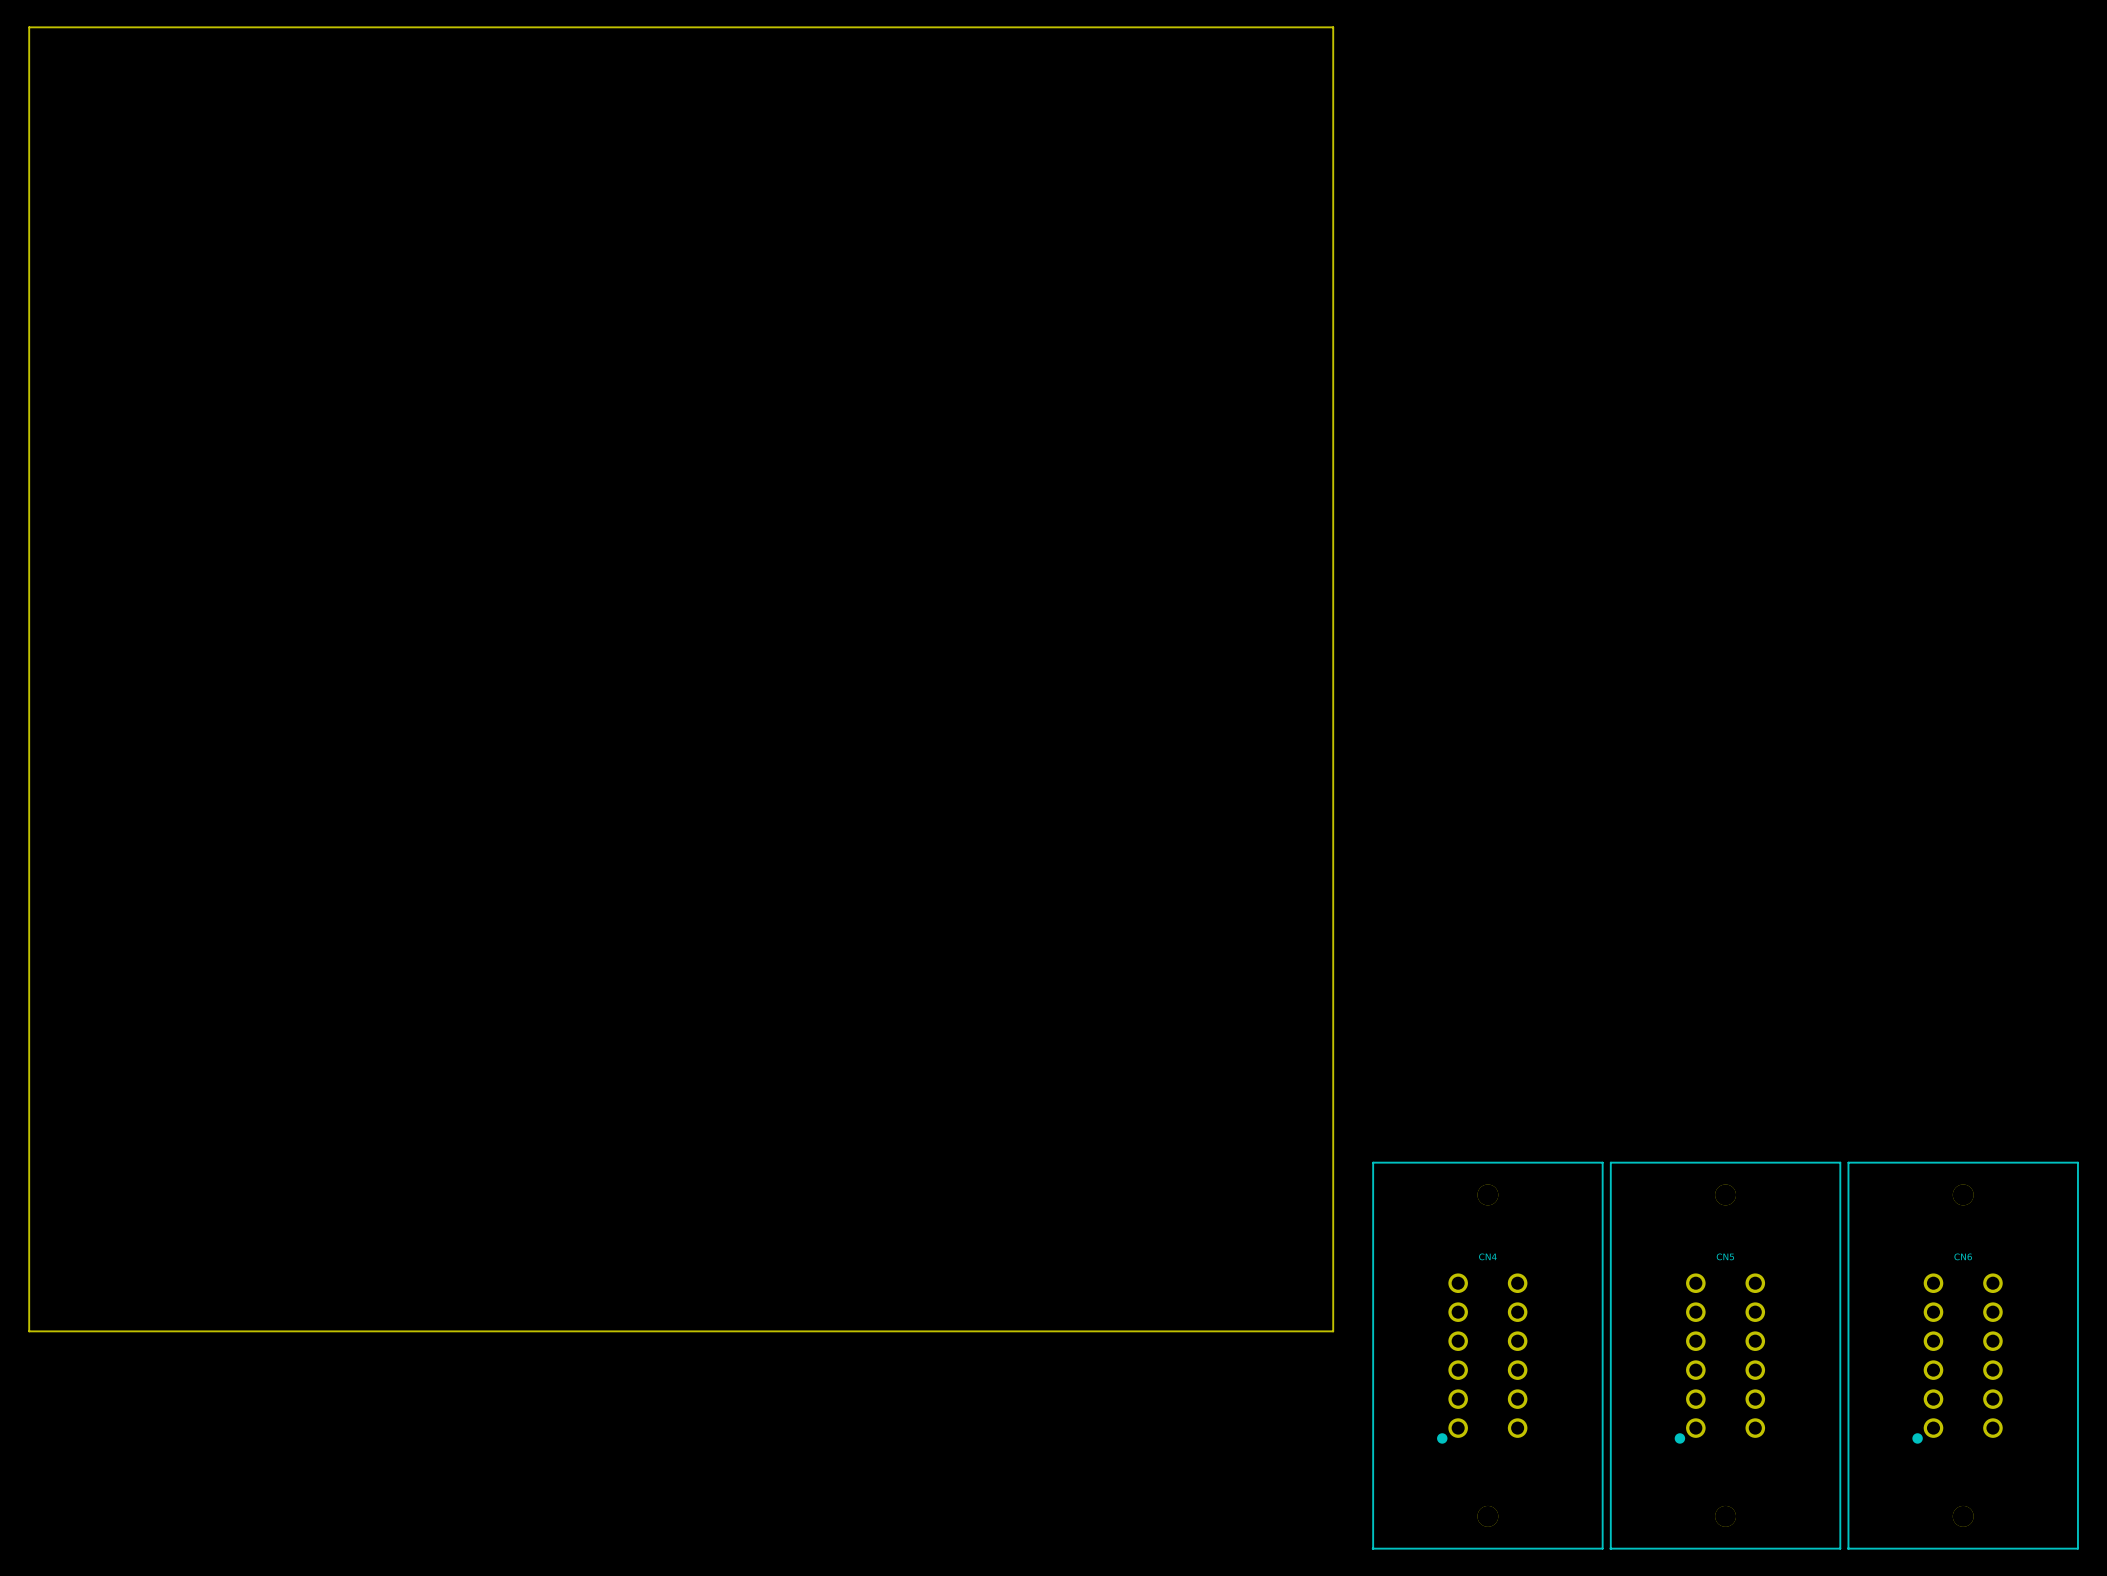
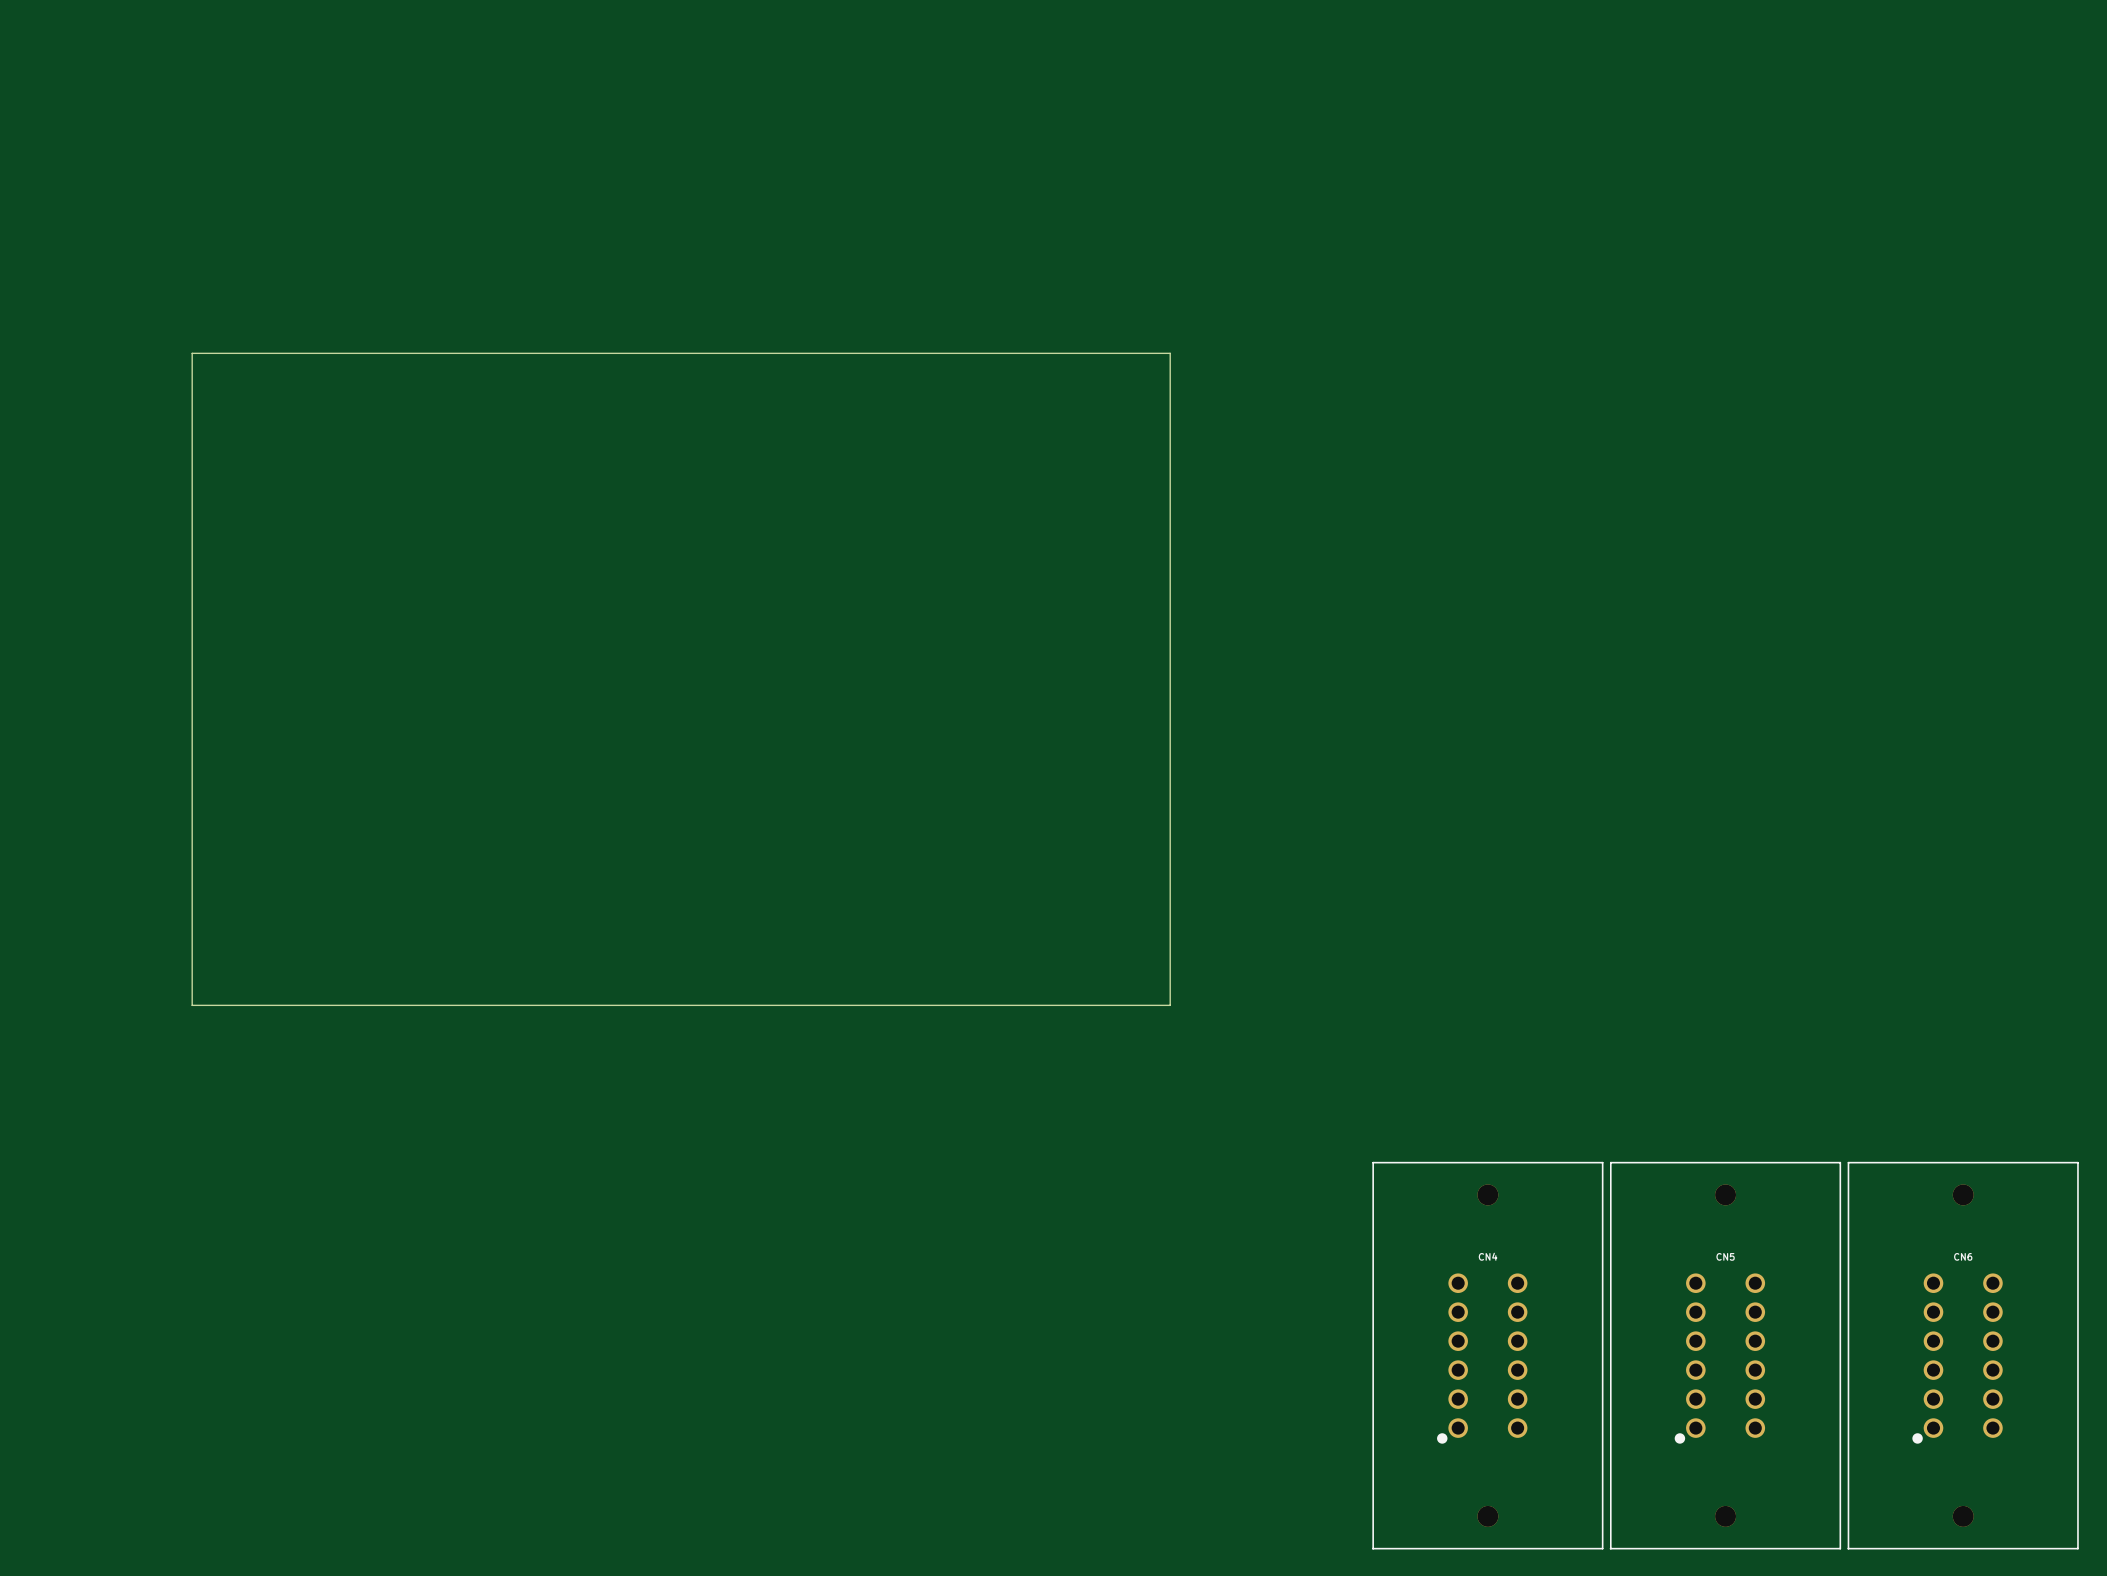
board edge: (29, 27) (1333, 27) (1333, 1331) (29, 1331) (29, 27) -> none
board edge: none -> (192, 353) (1170, 353) (1170, 1005) (192, 1005) (192, 353)

